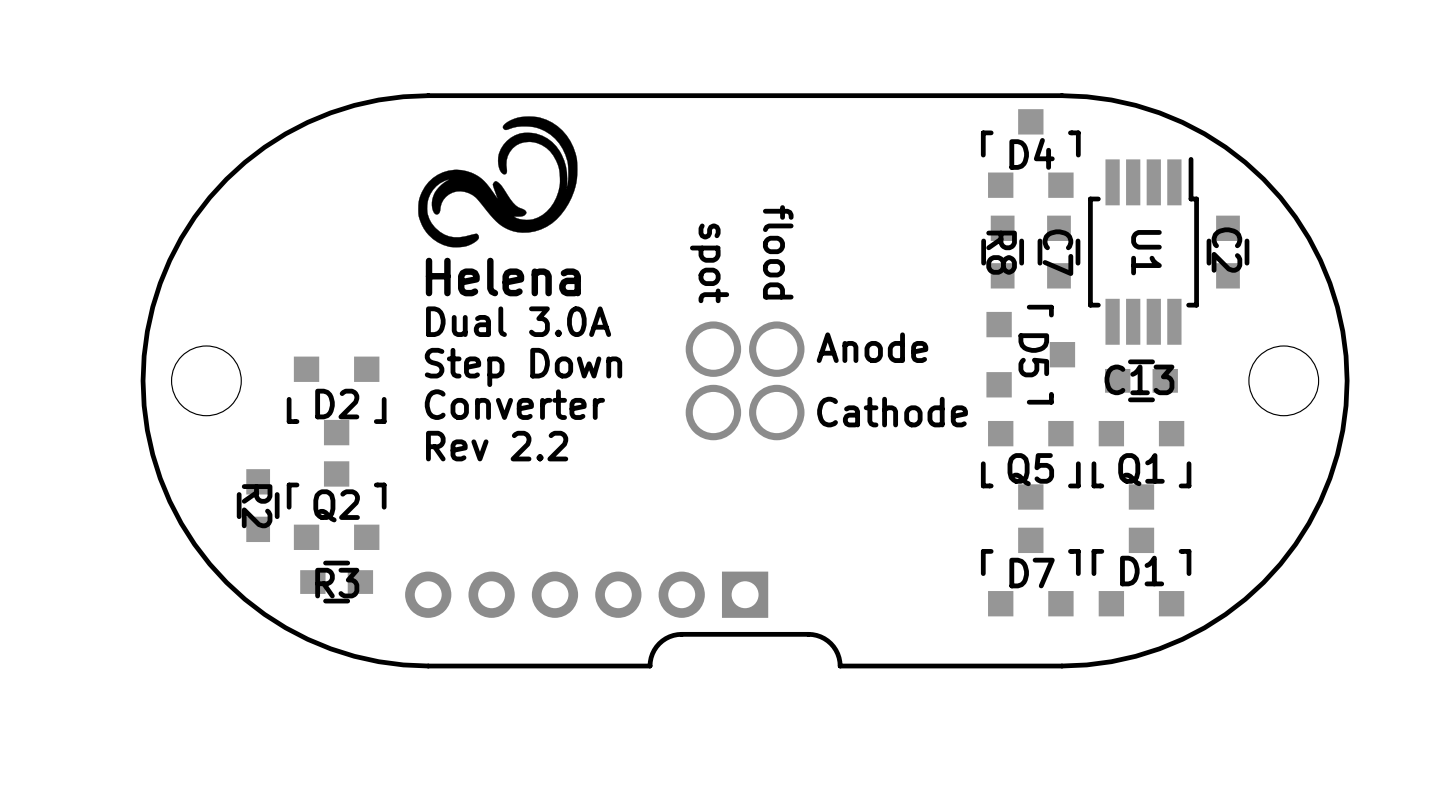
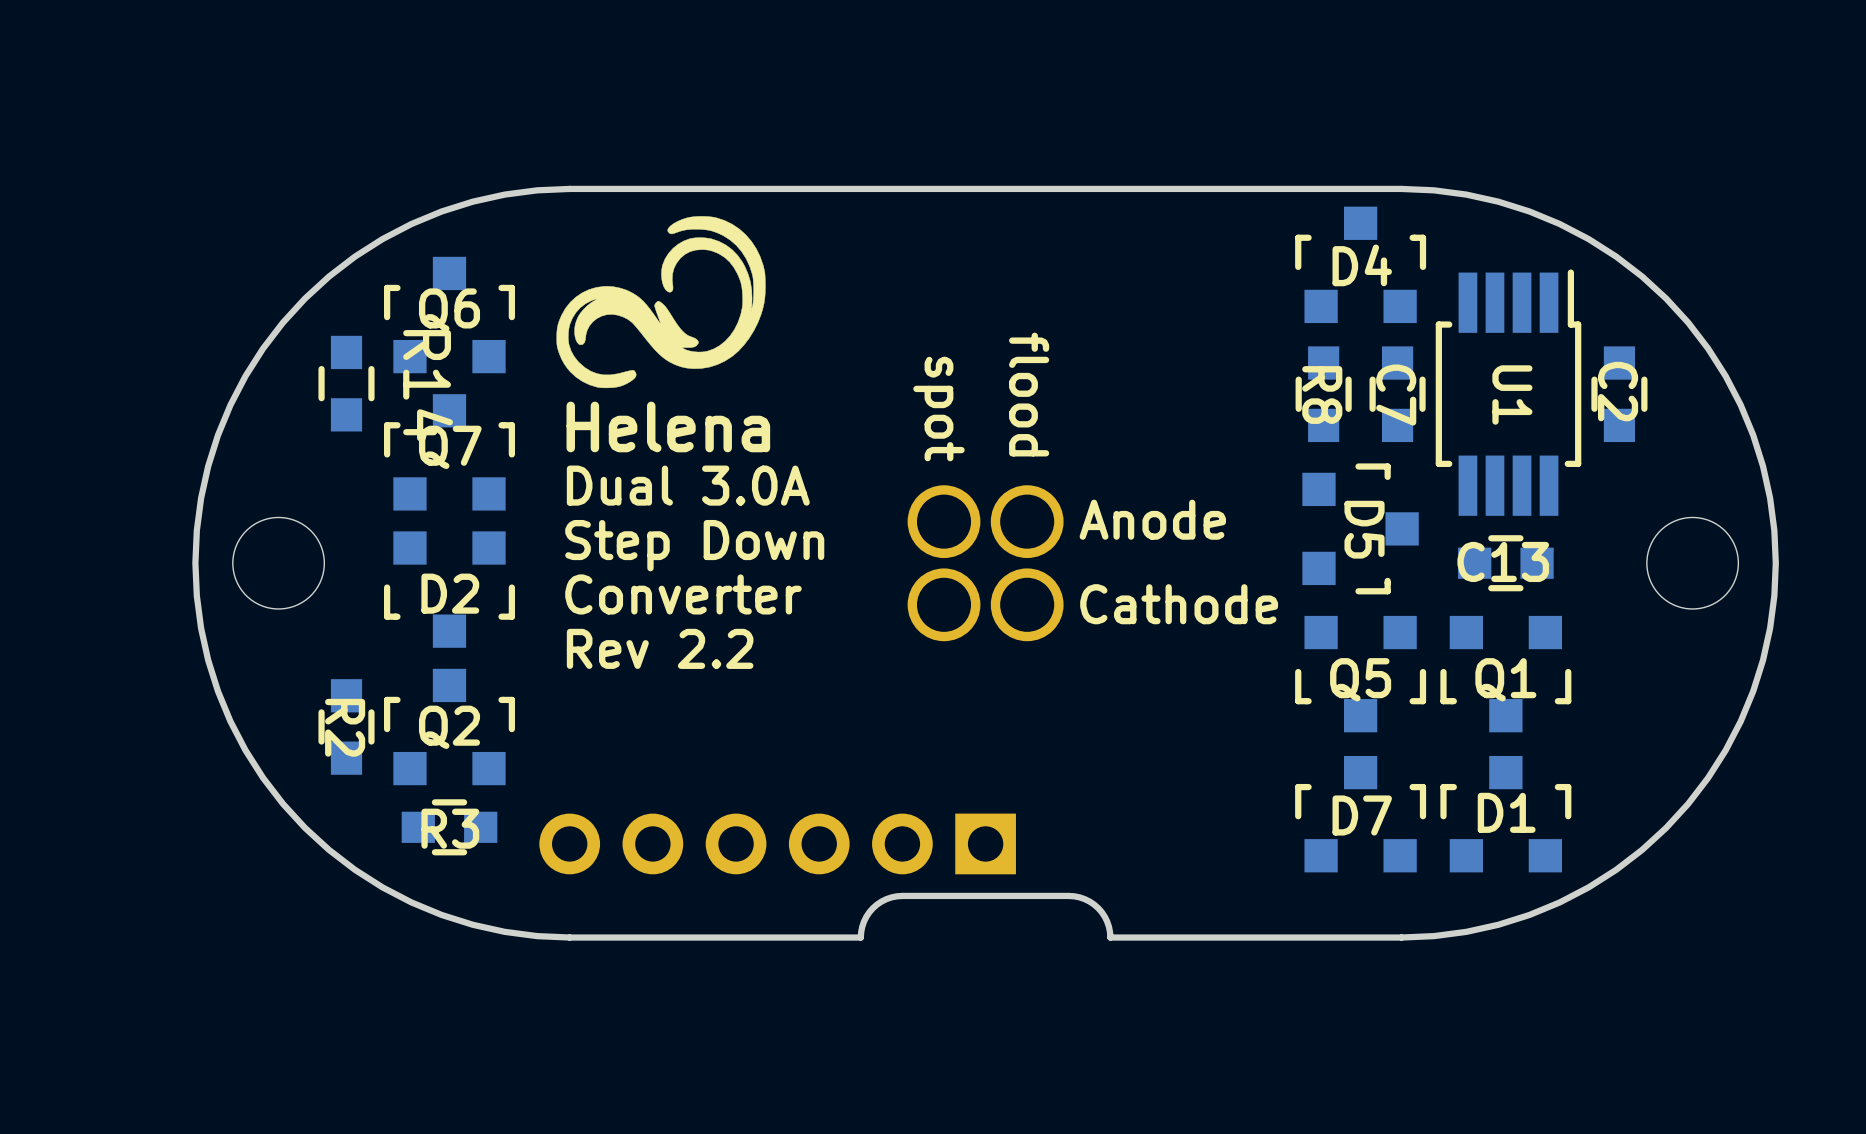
Q6: none -> (449, 315)
R14: none -> (346, 383)
Q7: none -> (449, 452)

